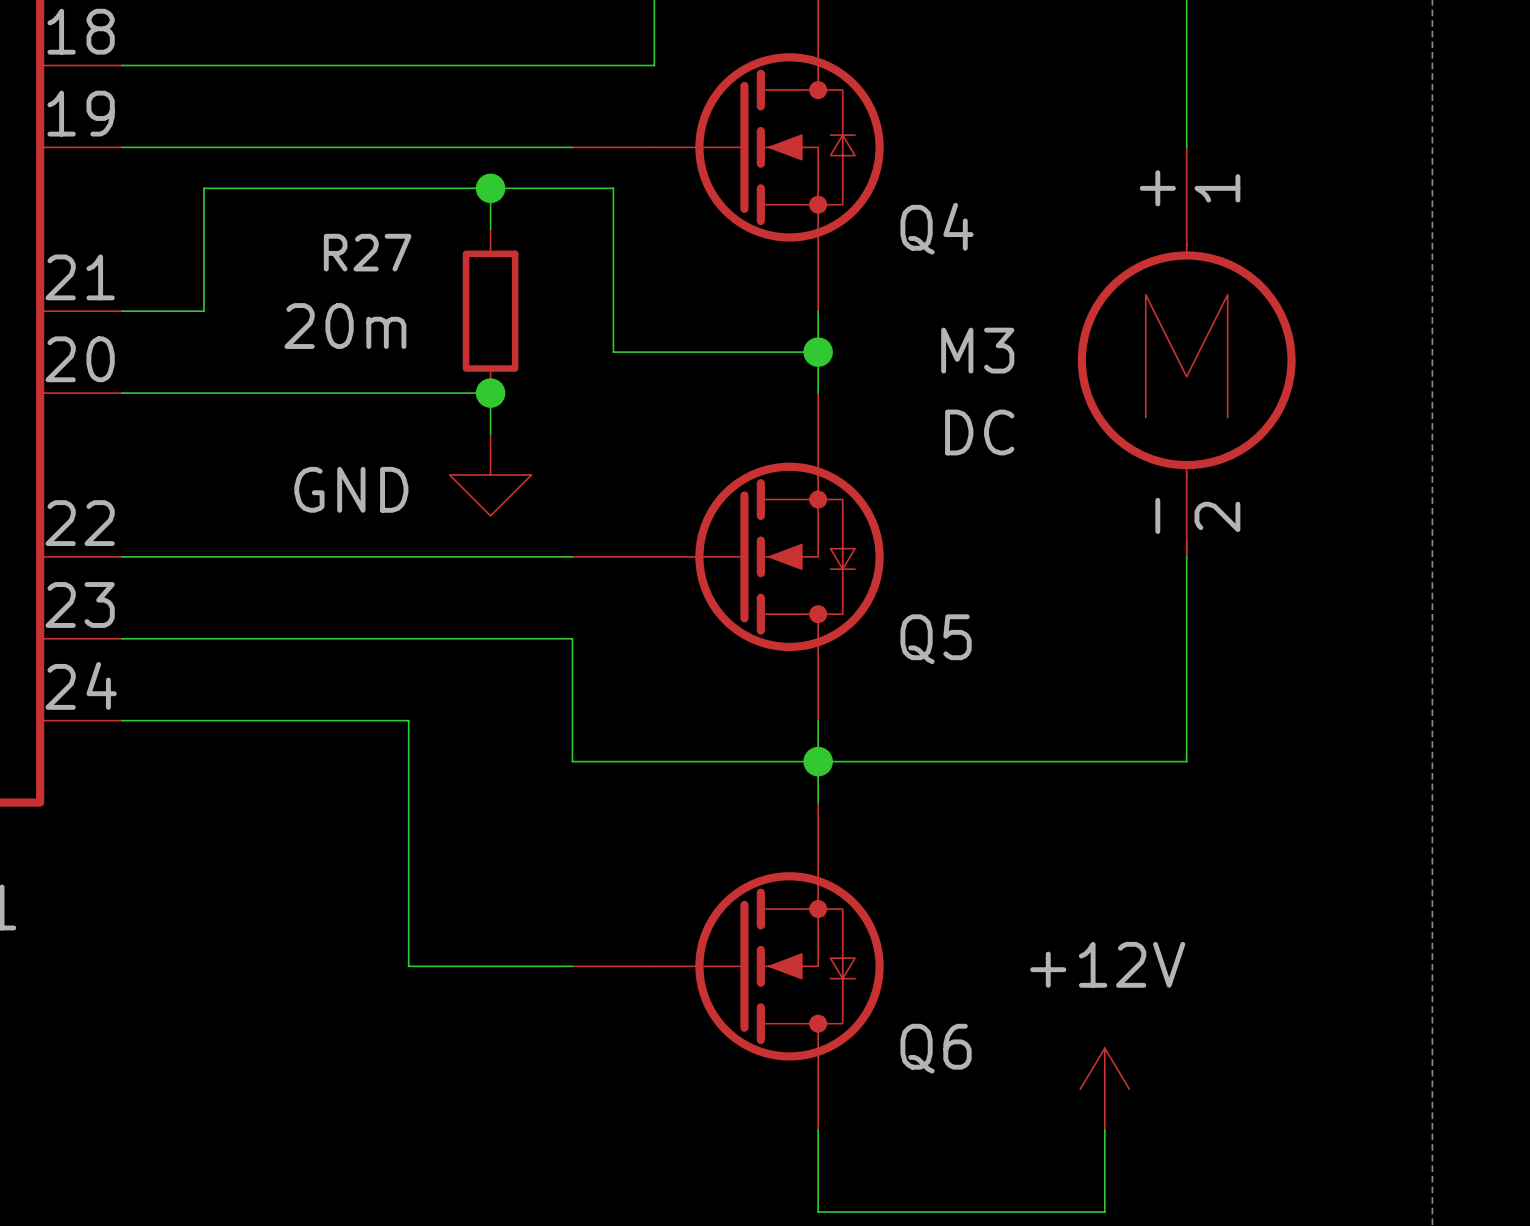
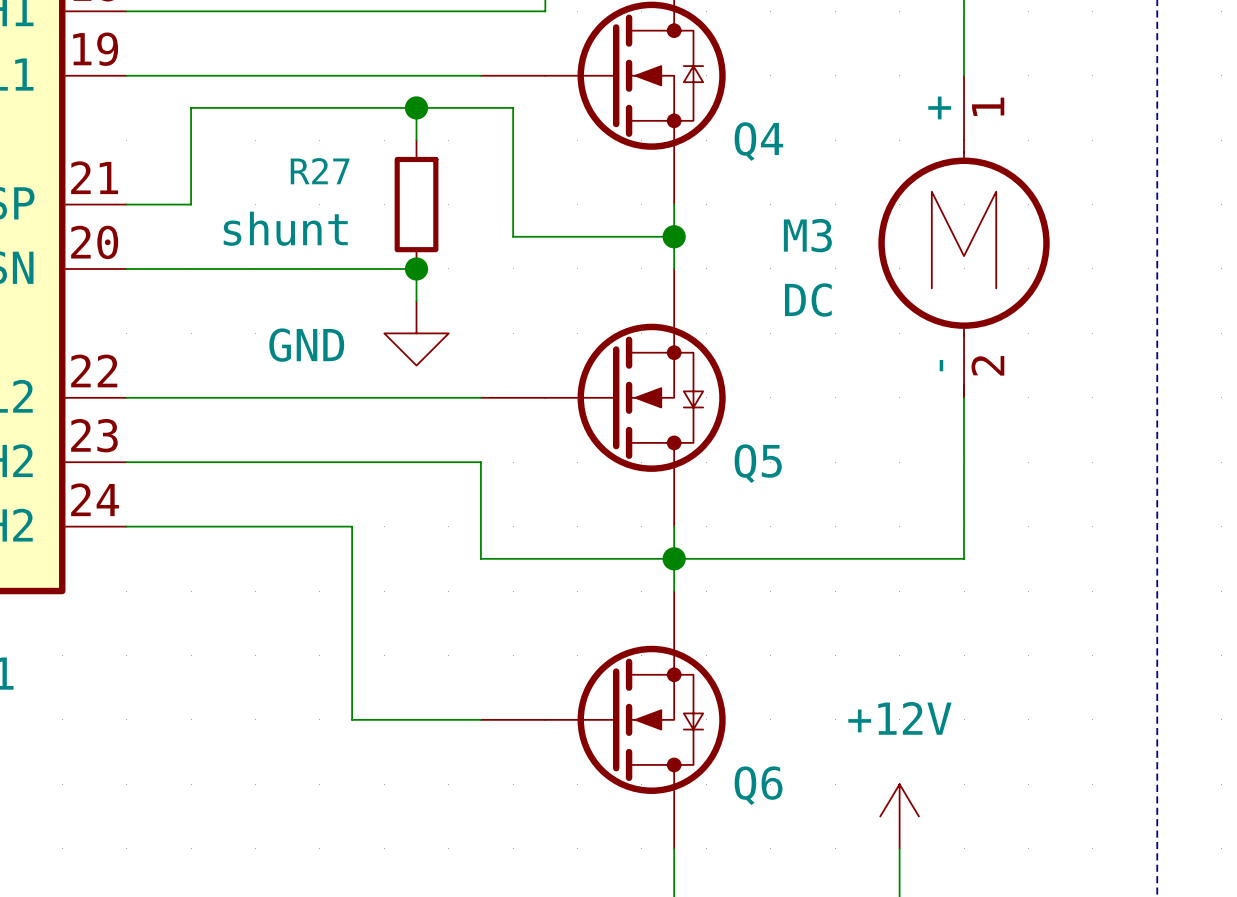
R27 name position: R27 (367, 252) -> R27 (320, 171)
R27 value: 20m (345, 326) -> shunt (285, 228)

